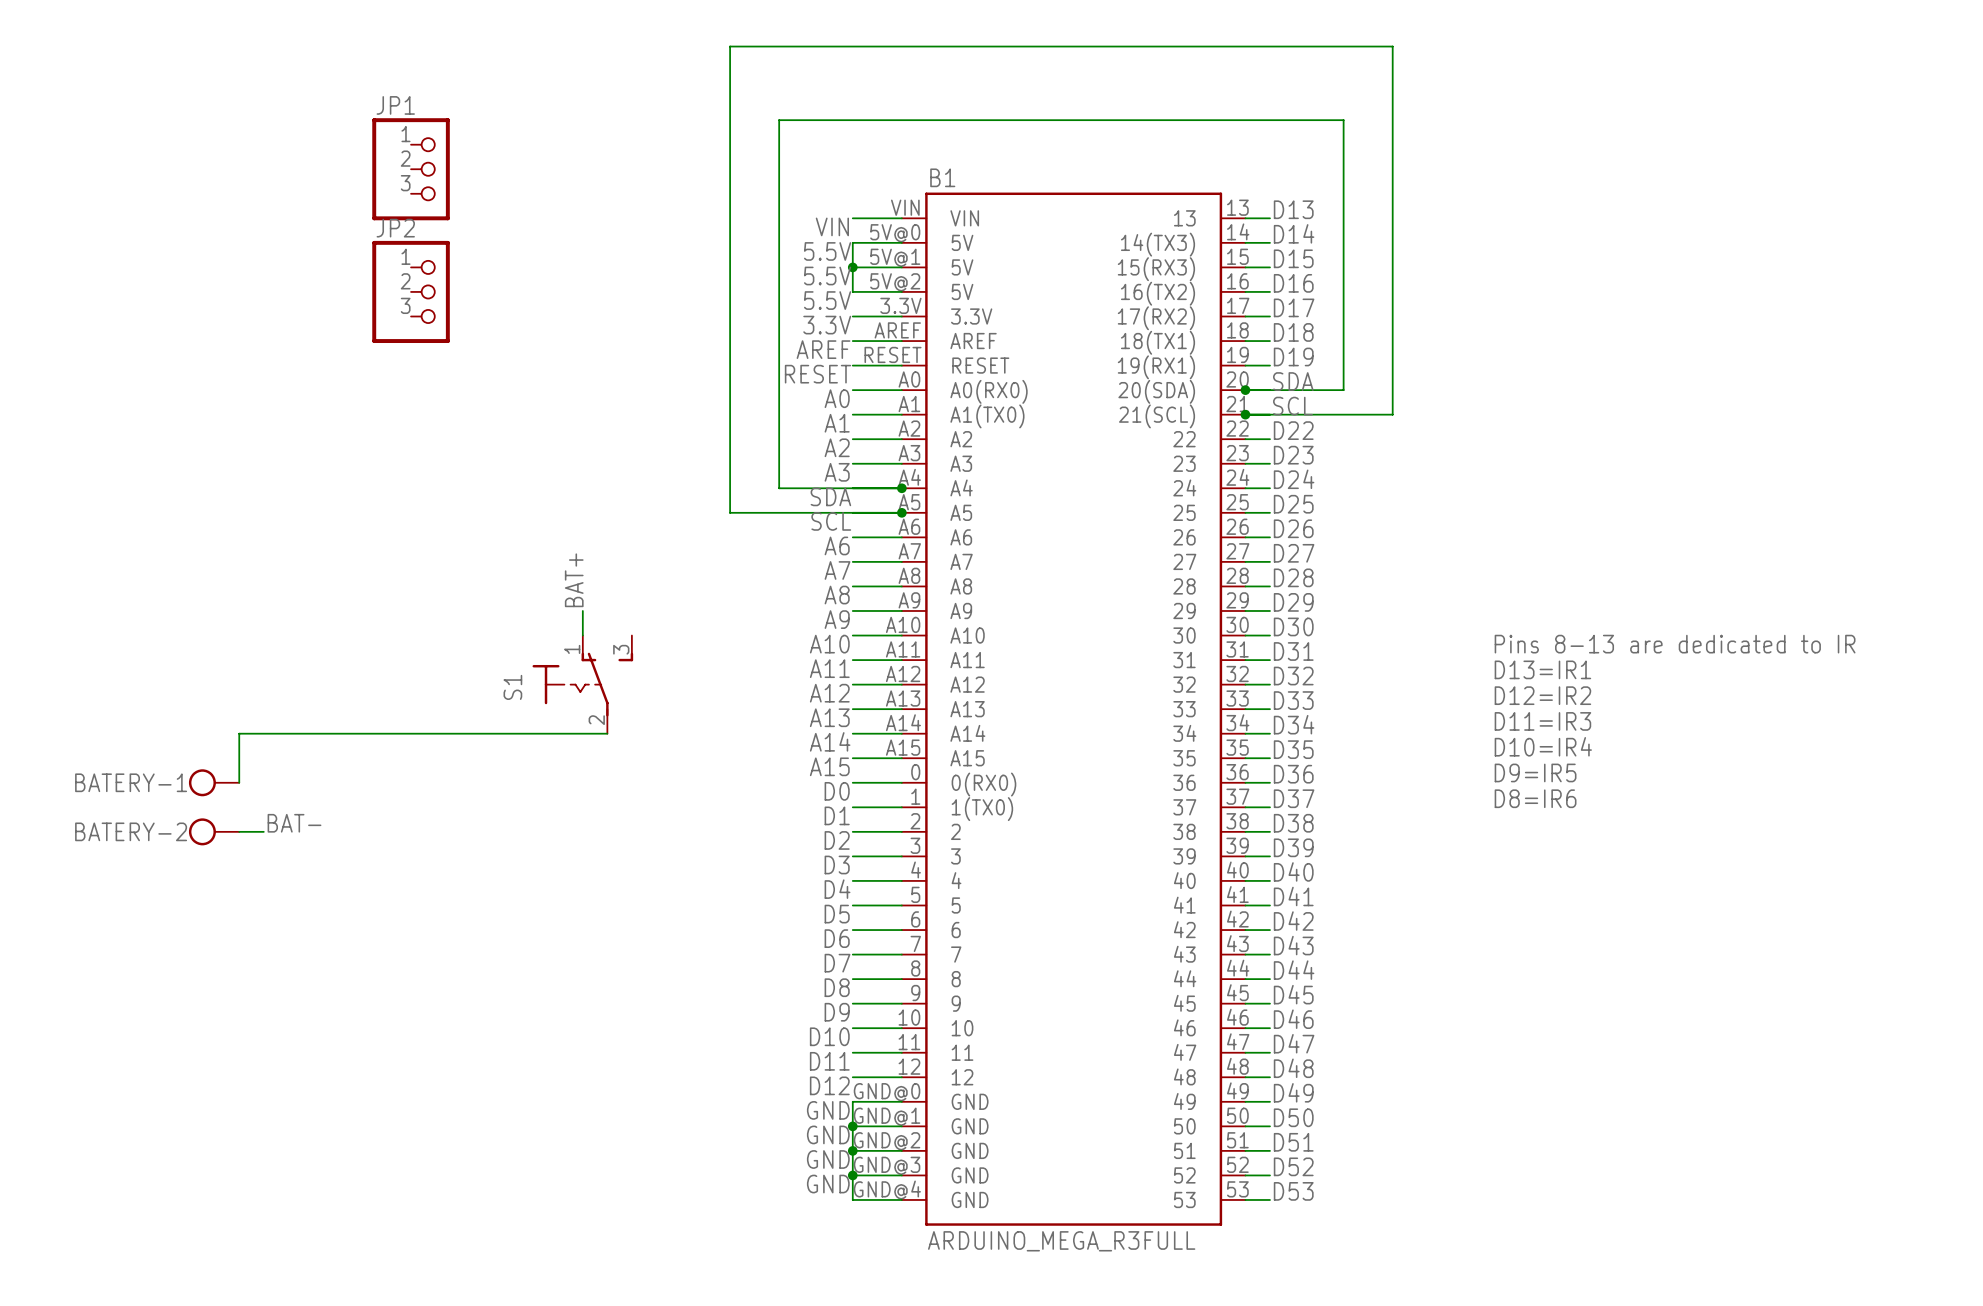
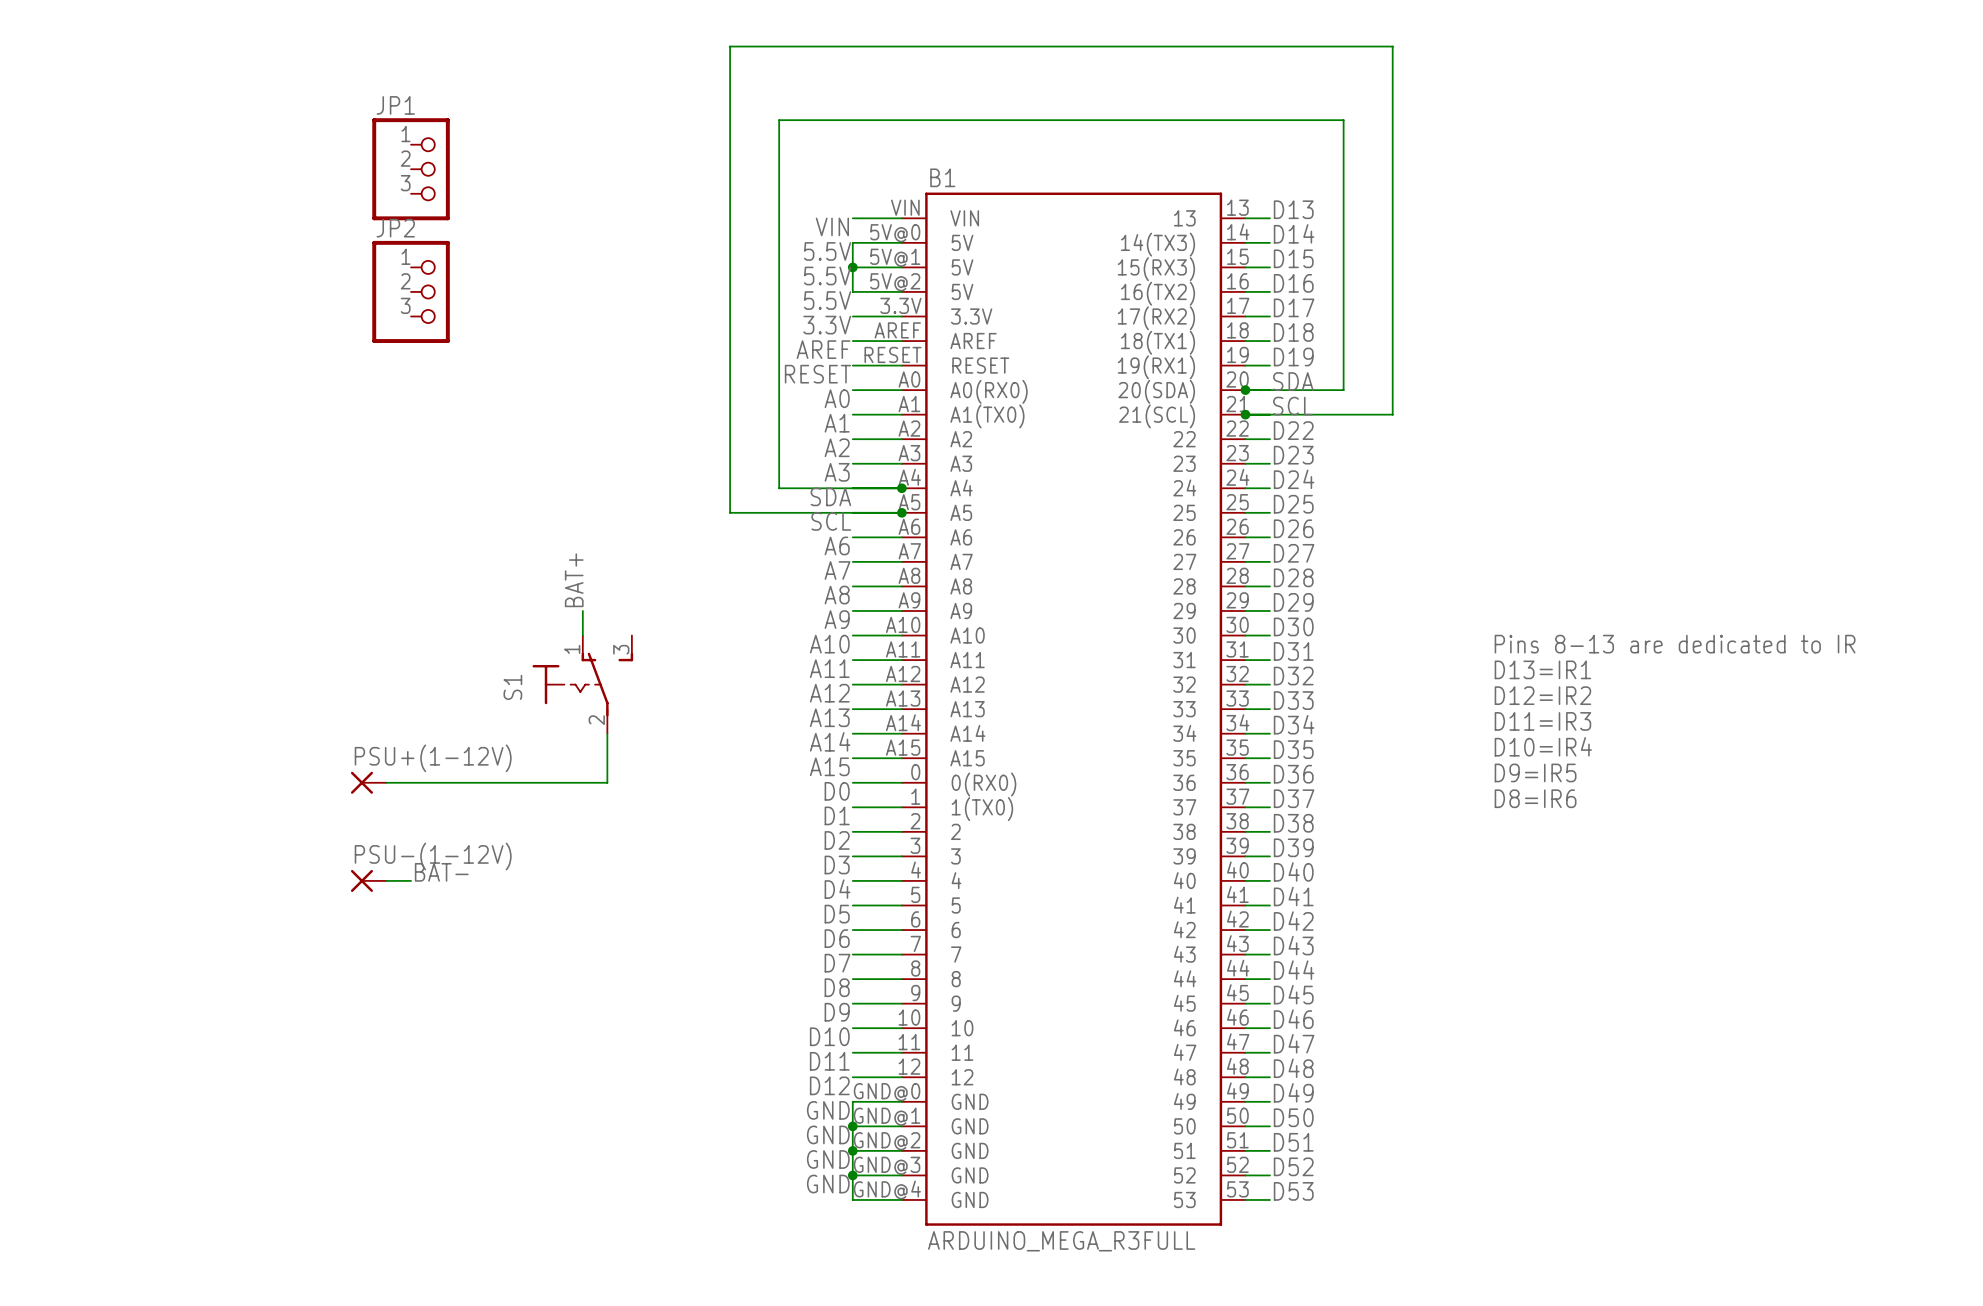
wire: (607, 733) (239, 733) (239, 782) -> (607, 733) (607, 782) (386, 782)
BATERY-1: (214, 782) -> none
PSU+(1-12V): none -> (368, 782)
label position: BAT- (294, 823) -> BAT- (441, 872)
BATERY-2: (214, 831) -> none
wire: (239, 831) (263, 831) -> (386, 880) (411, 880)
PSU-(1-12V): none -> (368, 880)

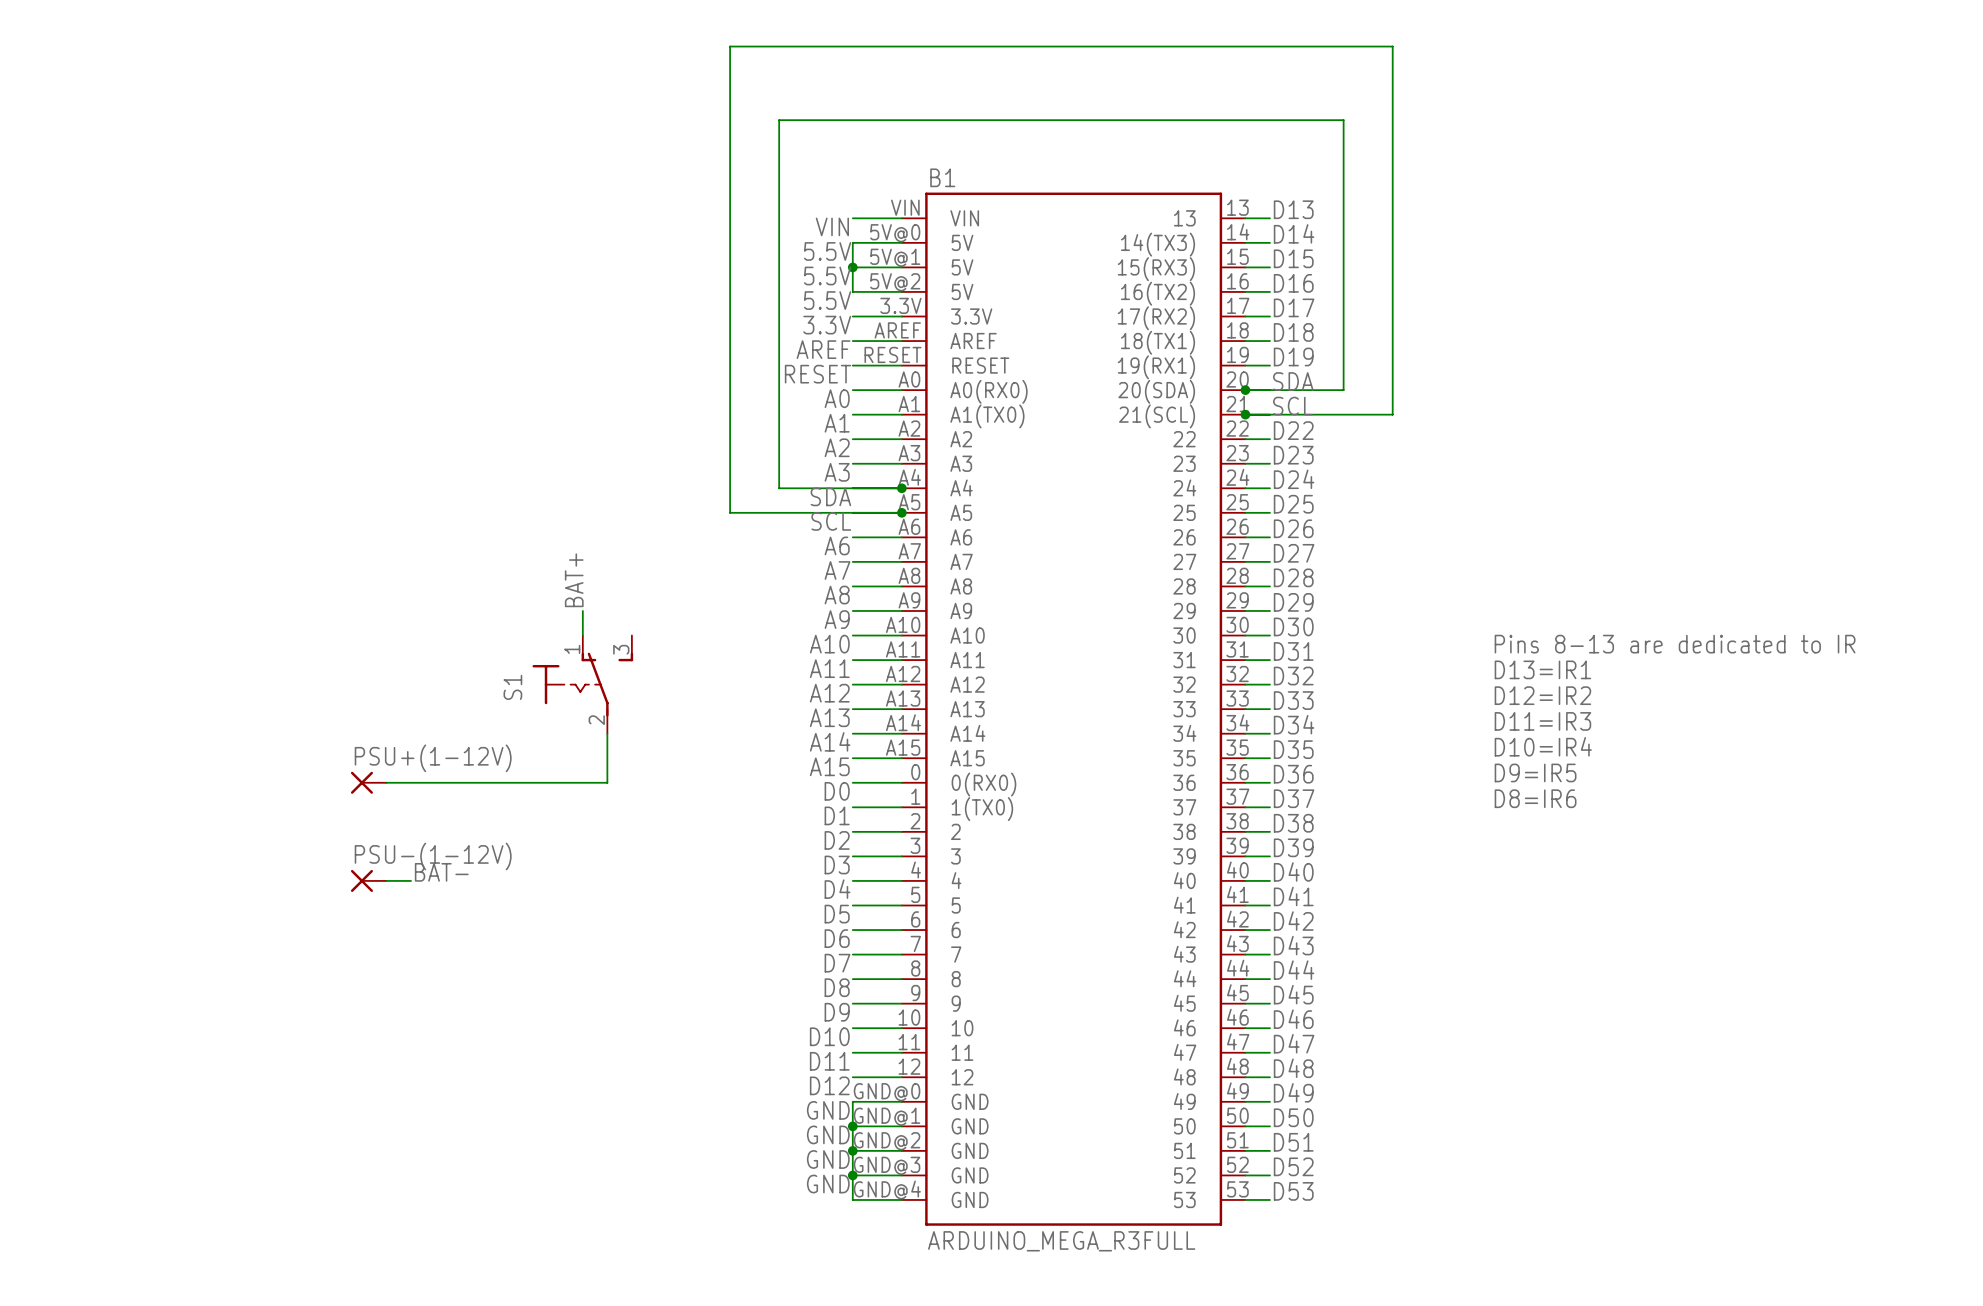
JP1: (411, 169) -> none
JP2: (411, 291) -> none

